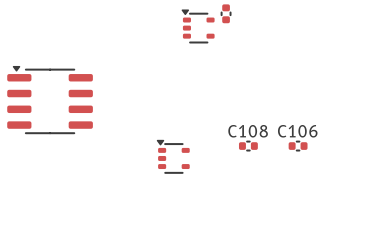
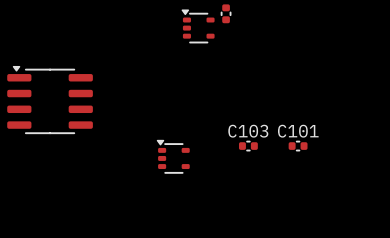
C108 name: C108 (248, 131) -> C103 (248, 131)
C106 name: C106 (297, 131) -> C101 (298, 131)

